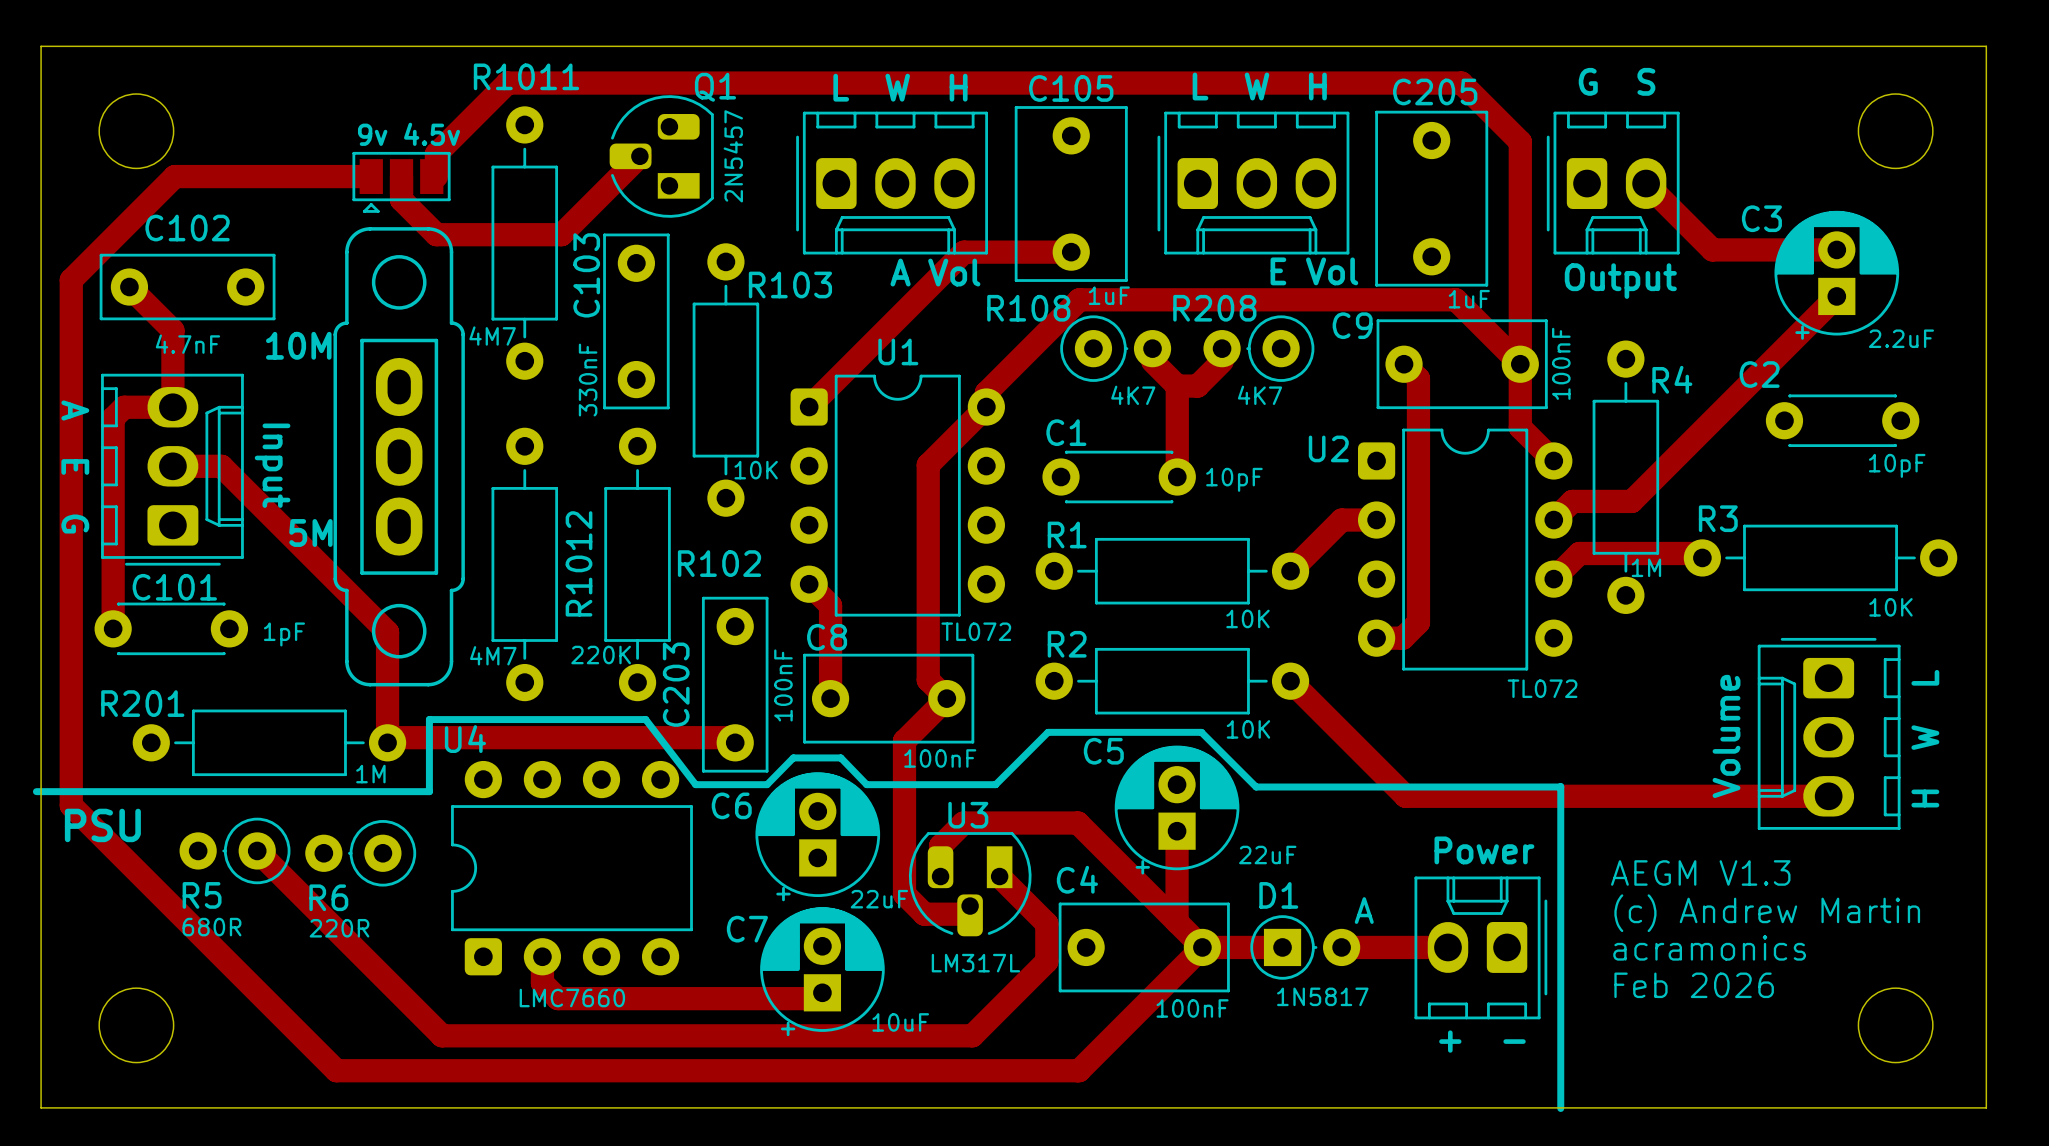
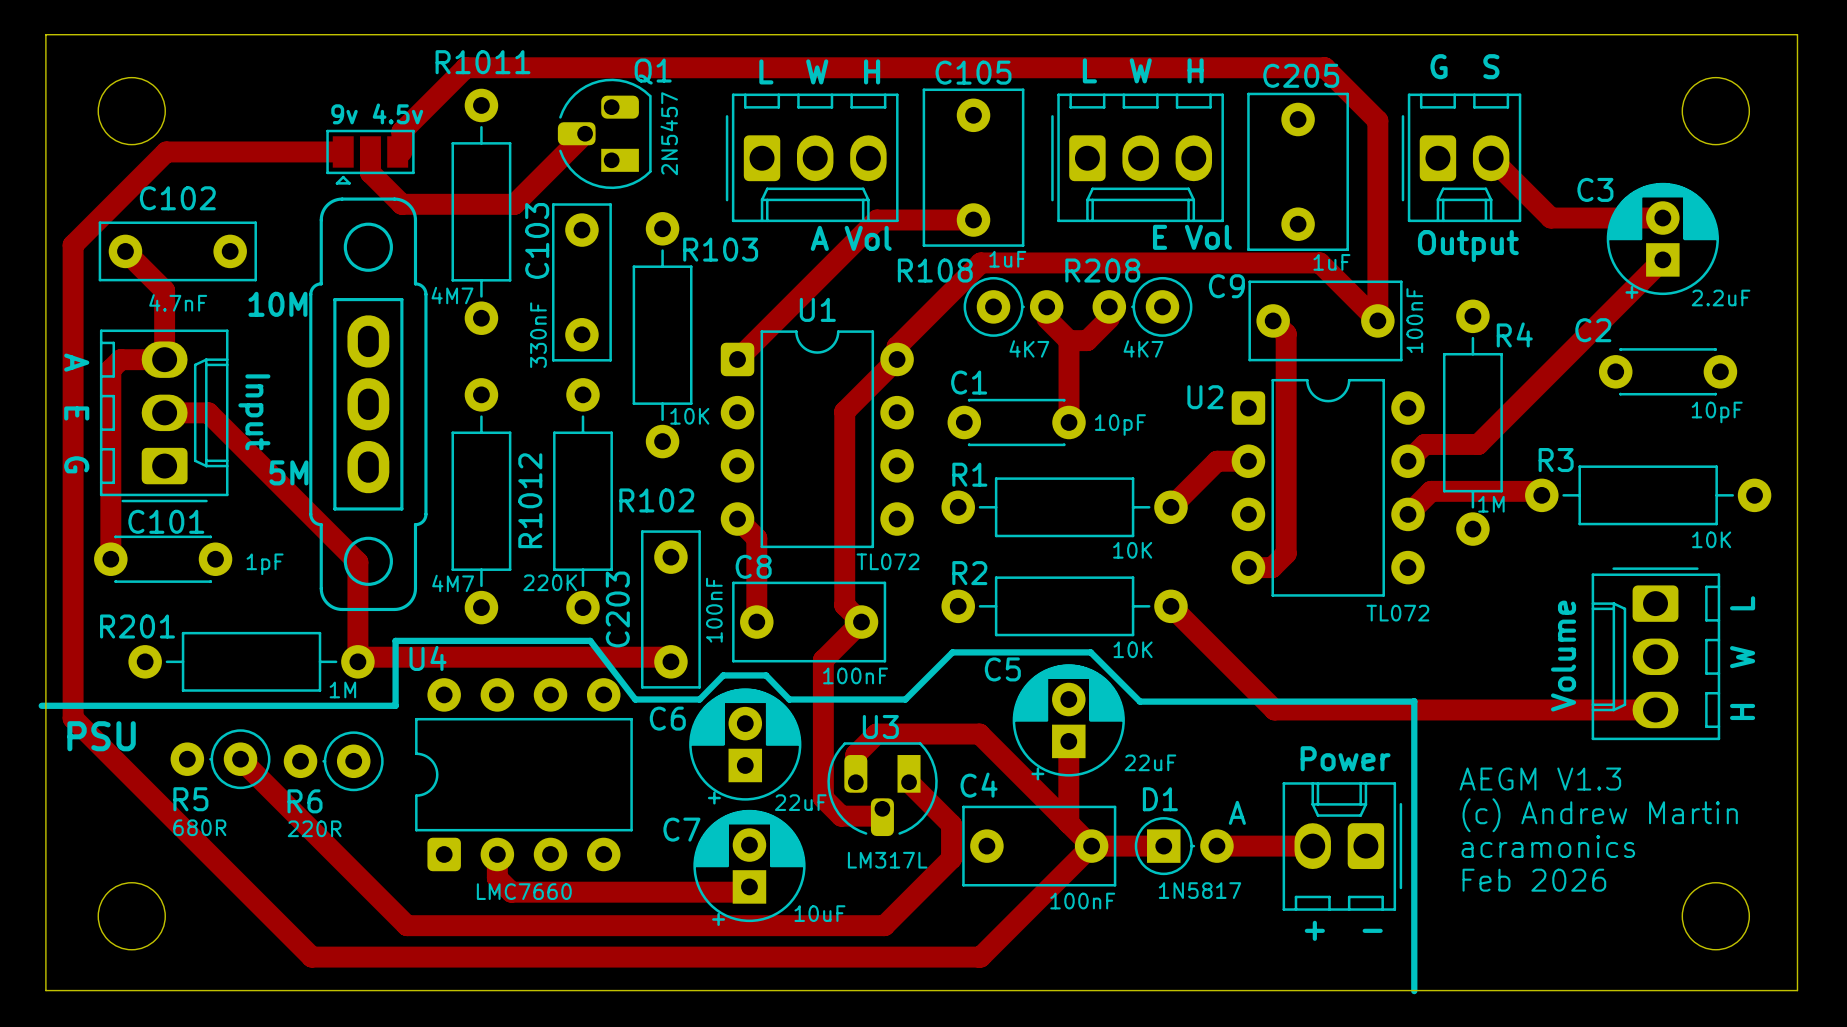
track: (1520, 364) (1520, 427) (1553, 460) -> none

